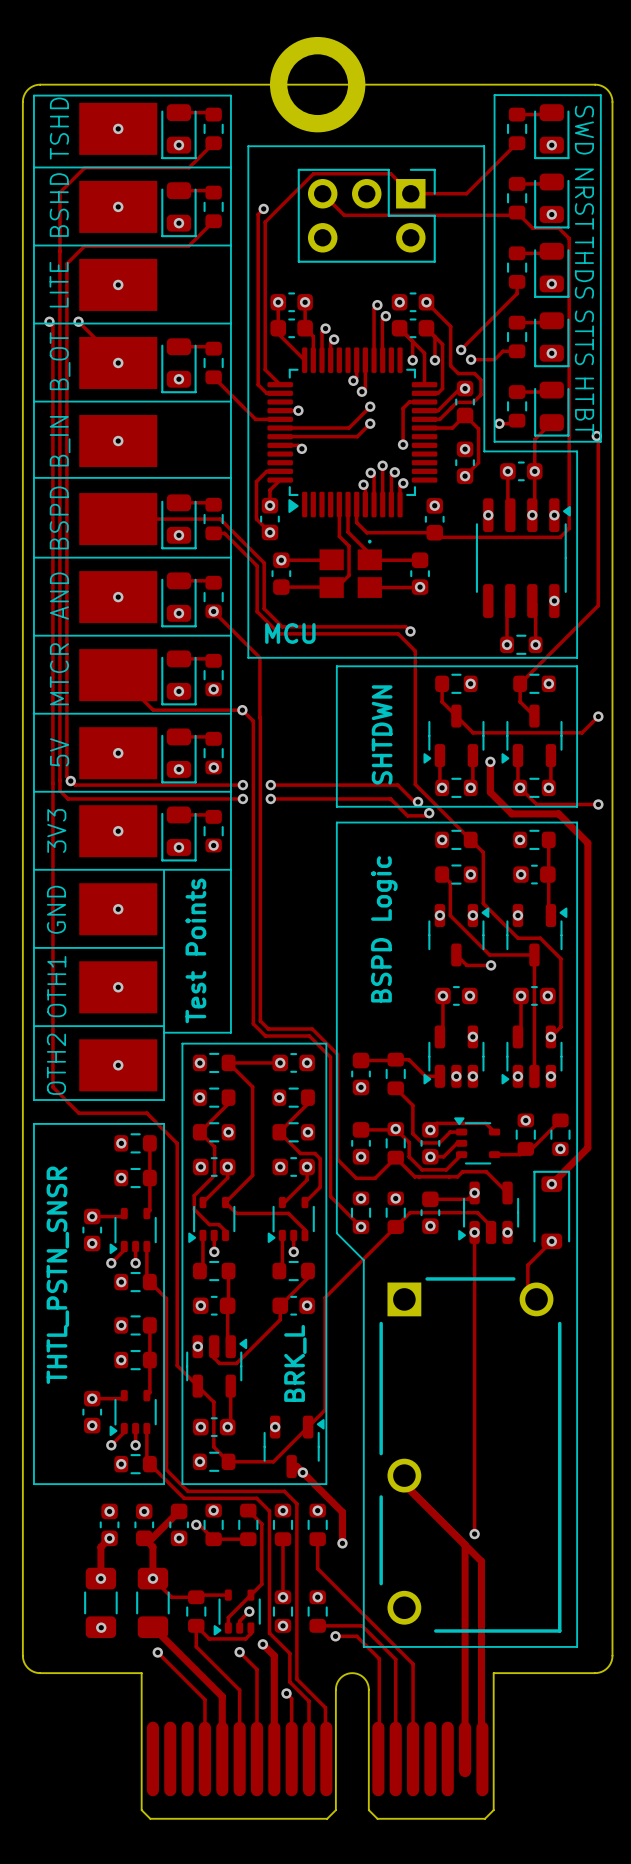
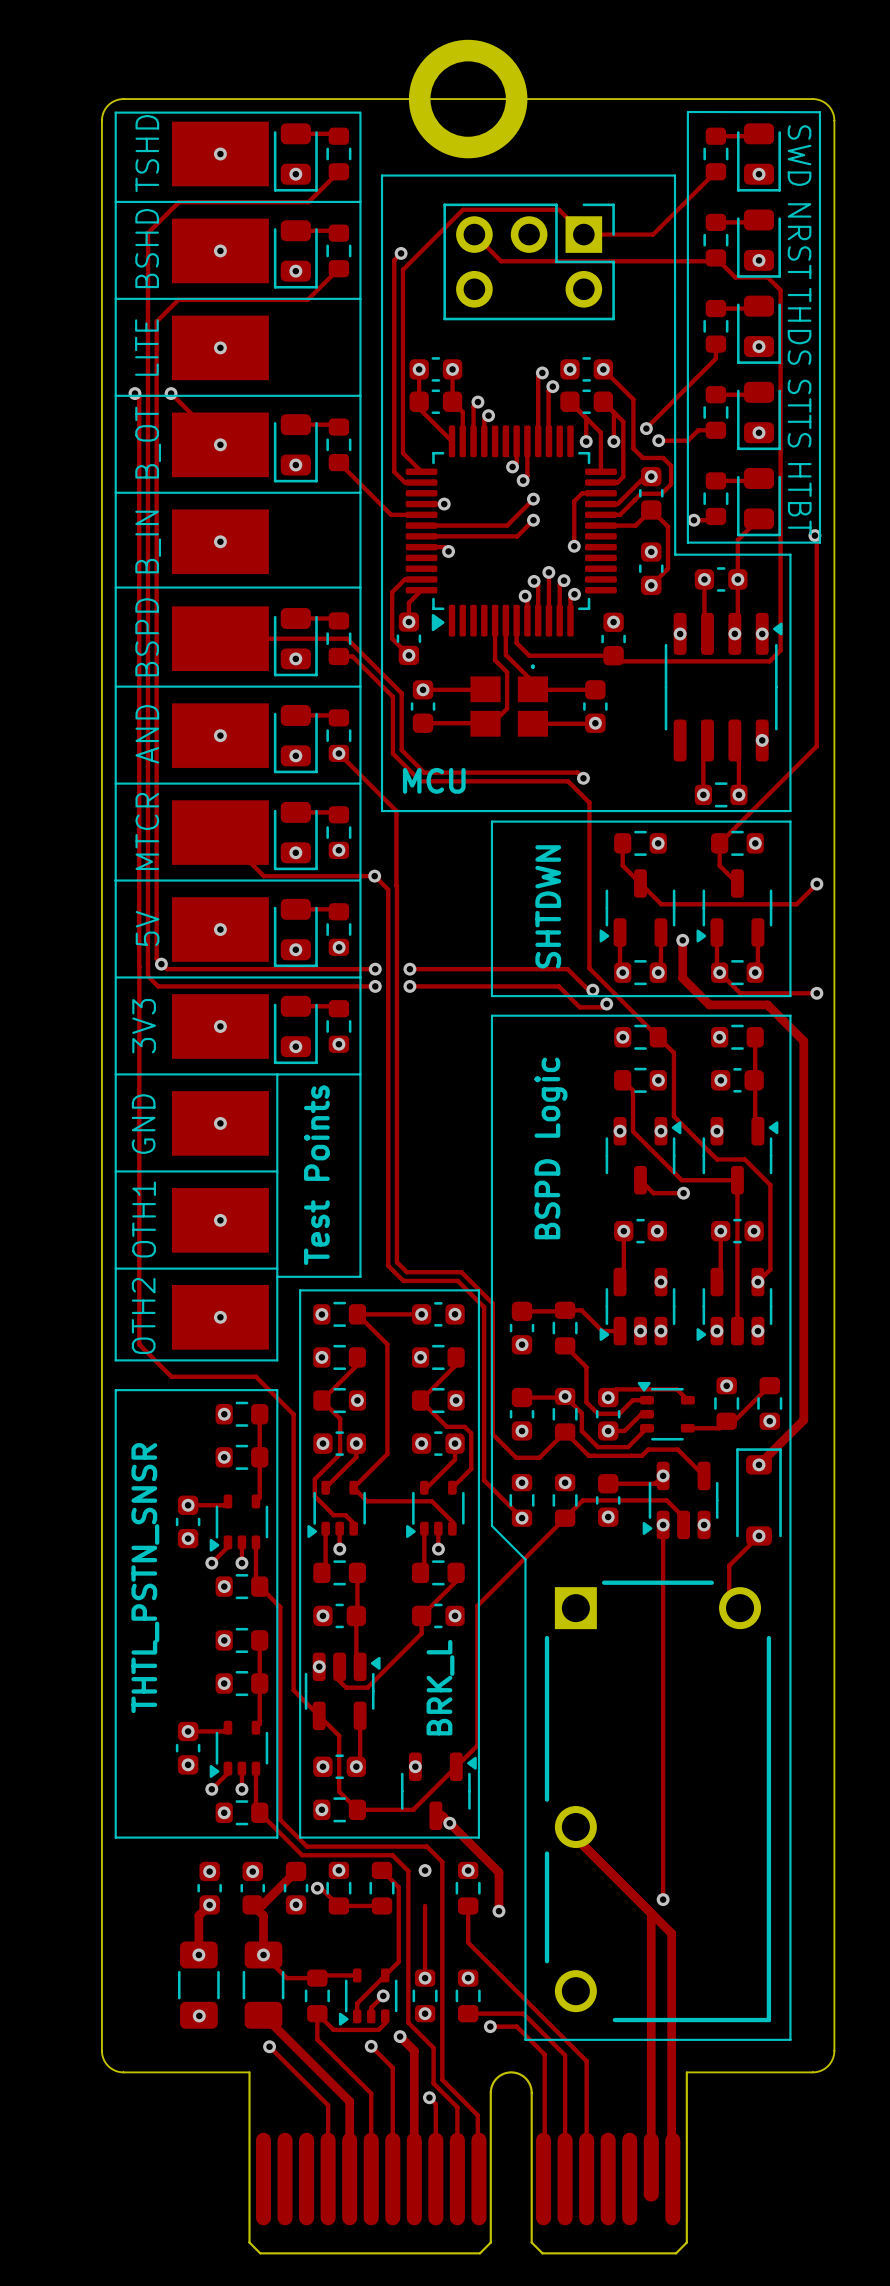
part: (282, 1524) -> none

